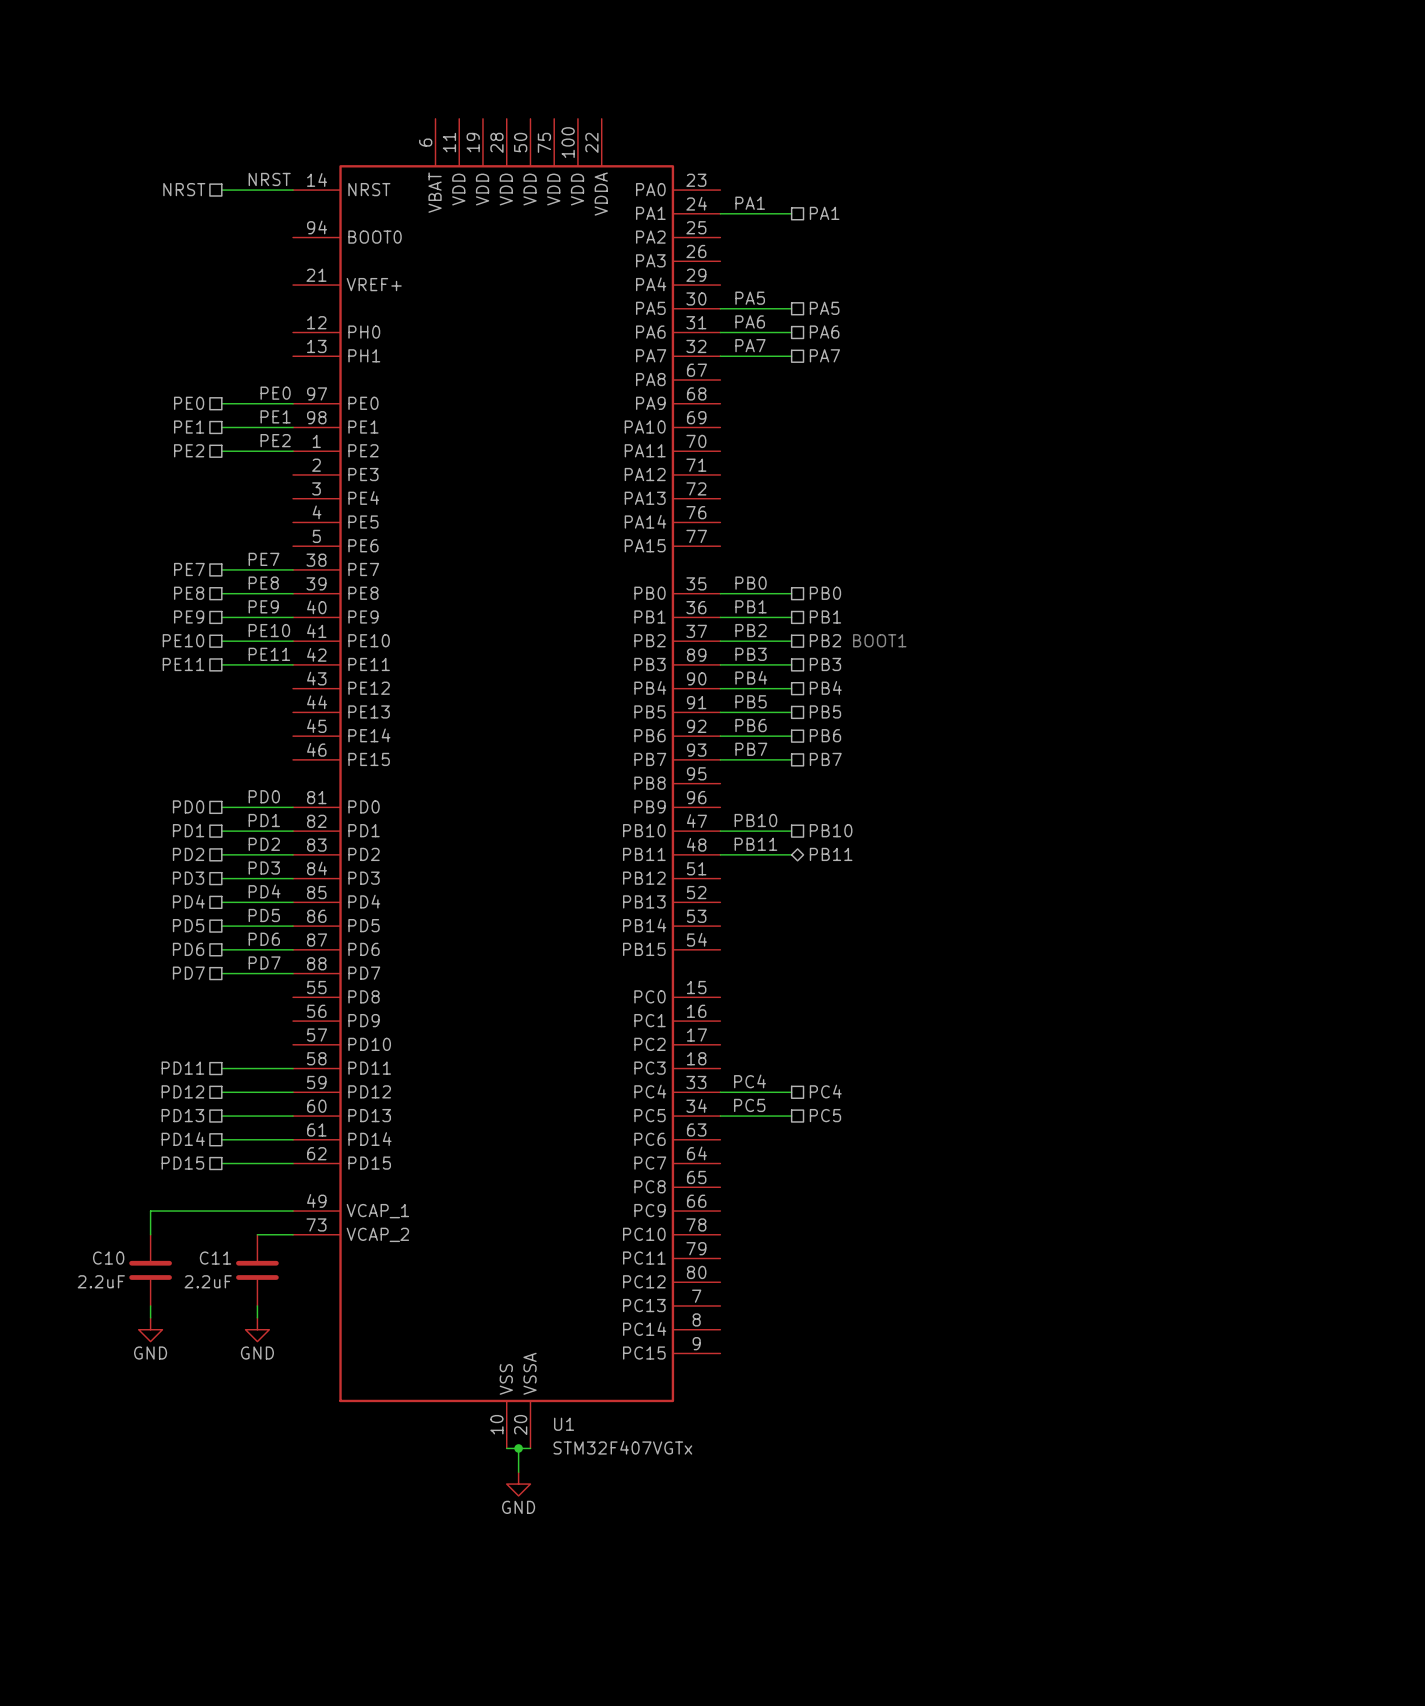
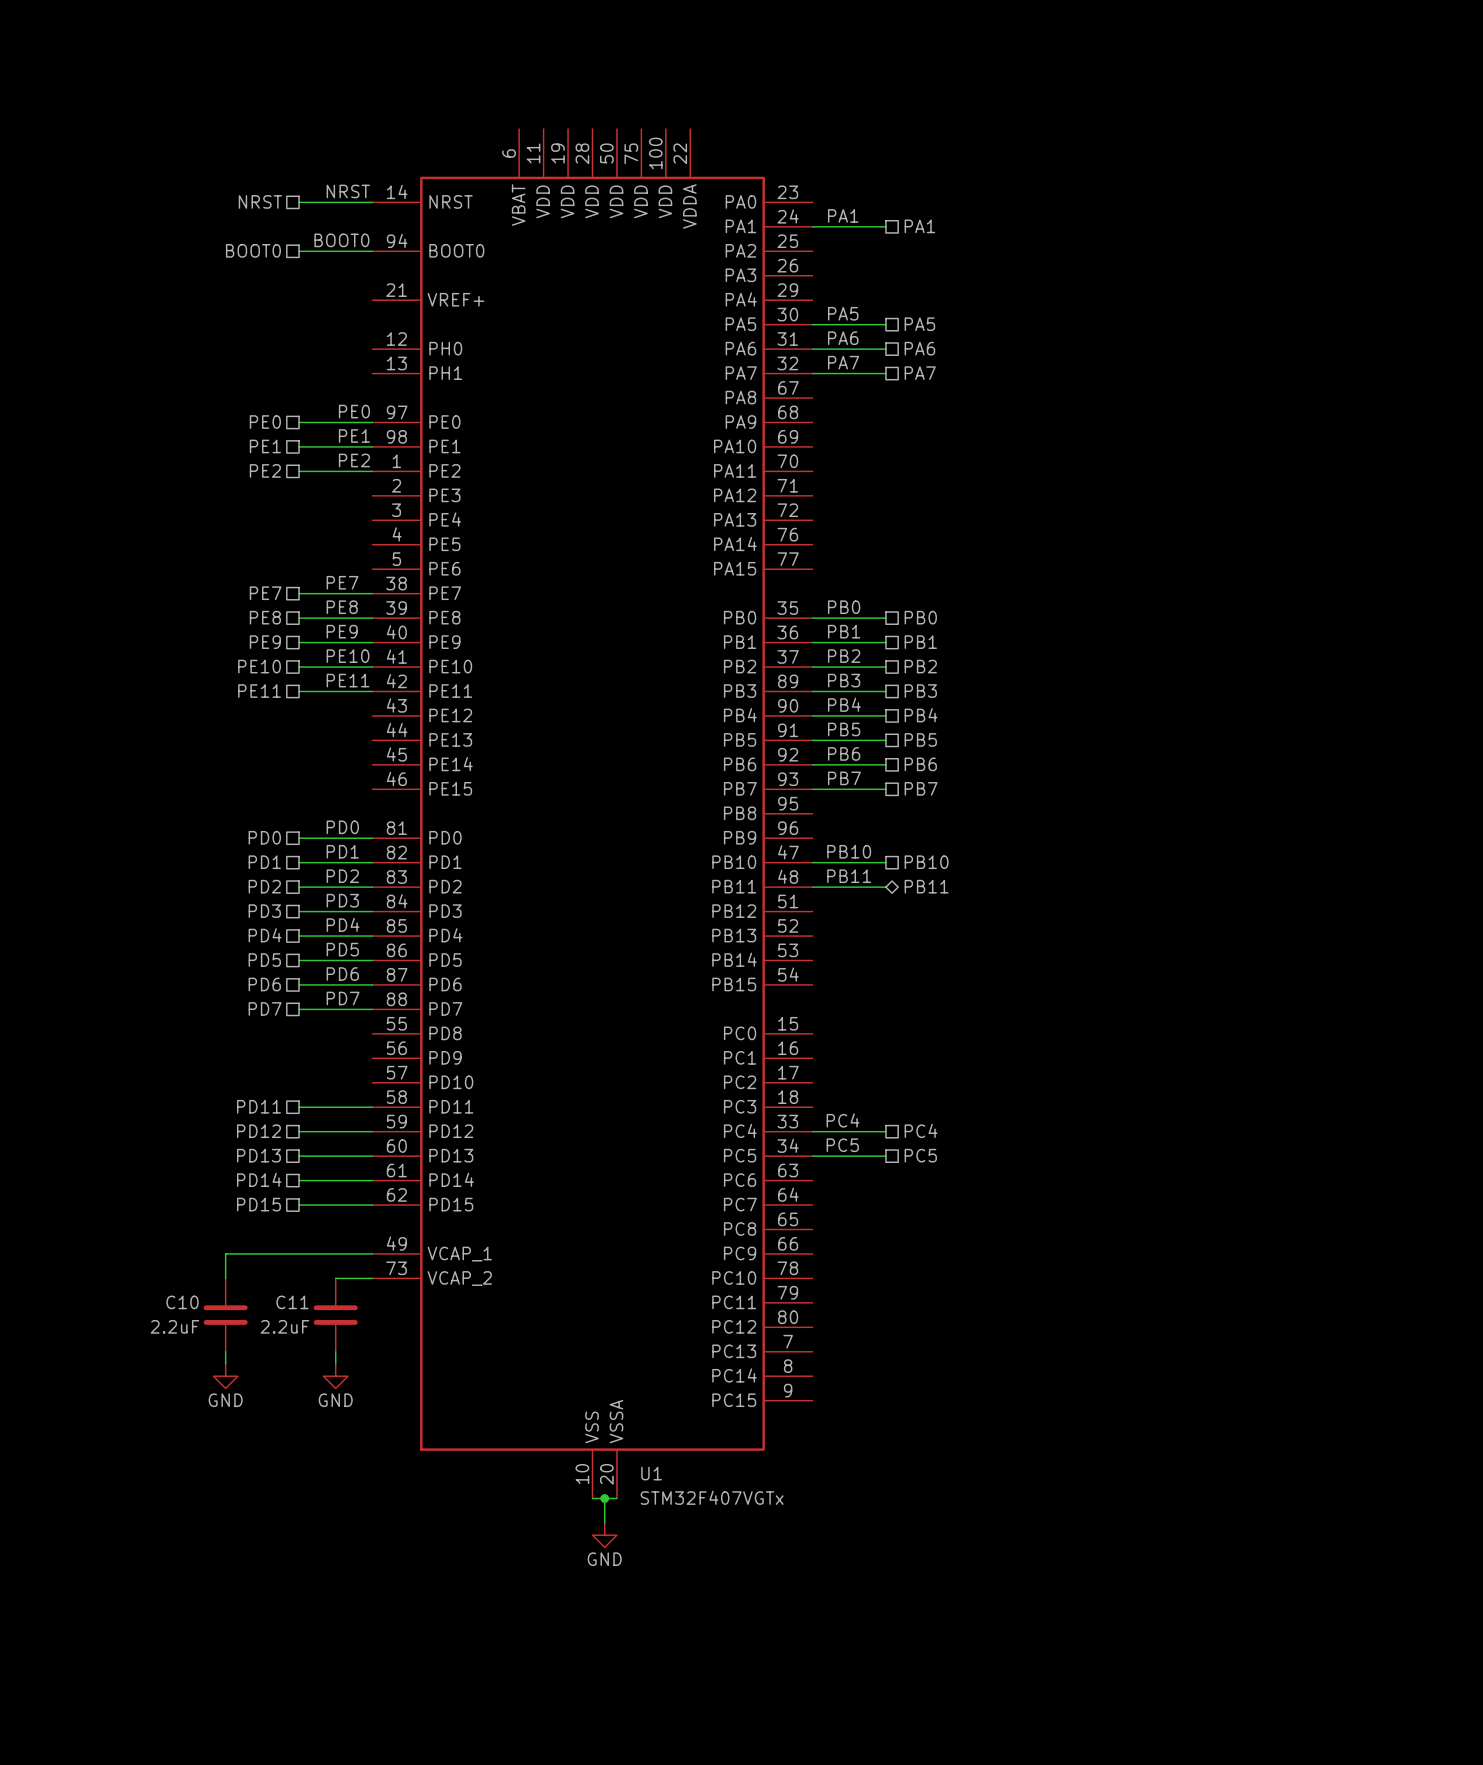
label: none -> BOOT0 (341, 240)
hierarchical label: none -> BOOT0 (253, 250)
wire: none -> (299, 251) (372, 251)
text: BOOT1 (879, 640) -> none

